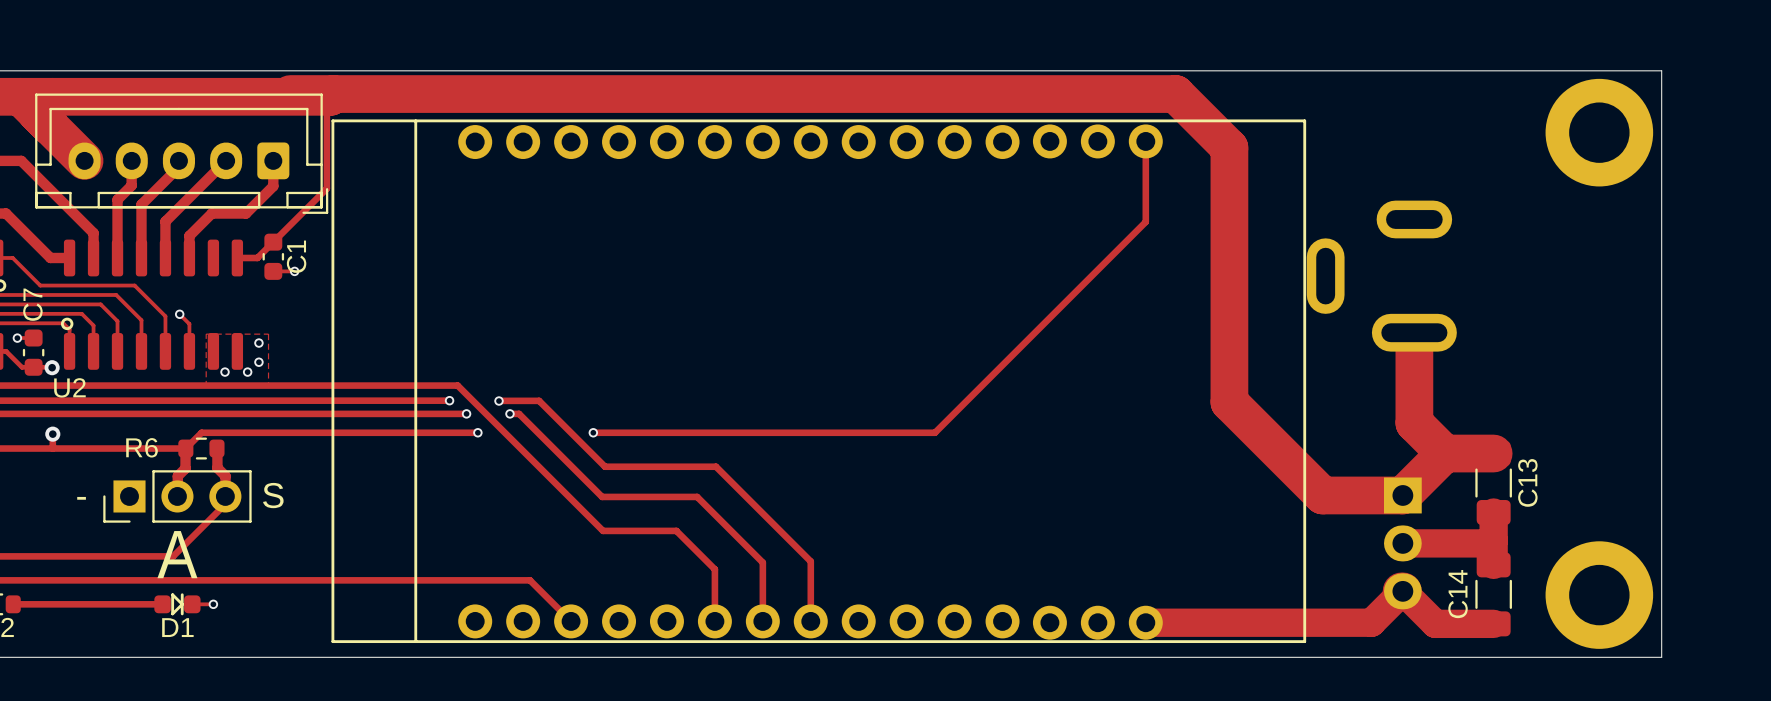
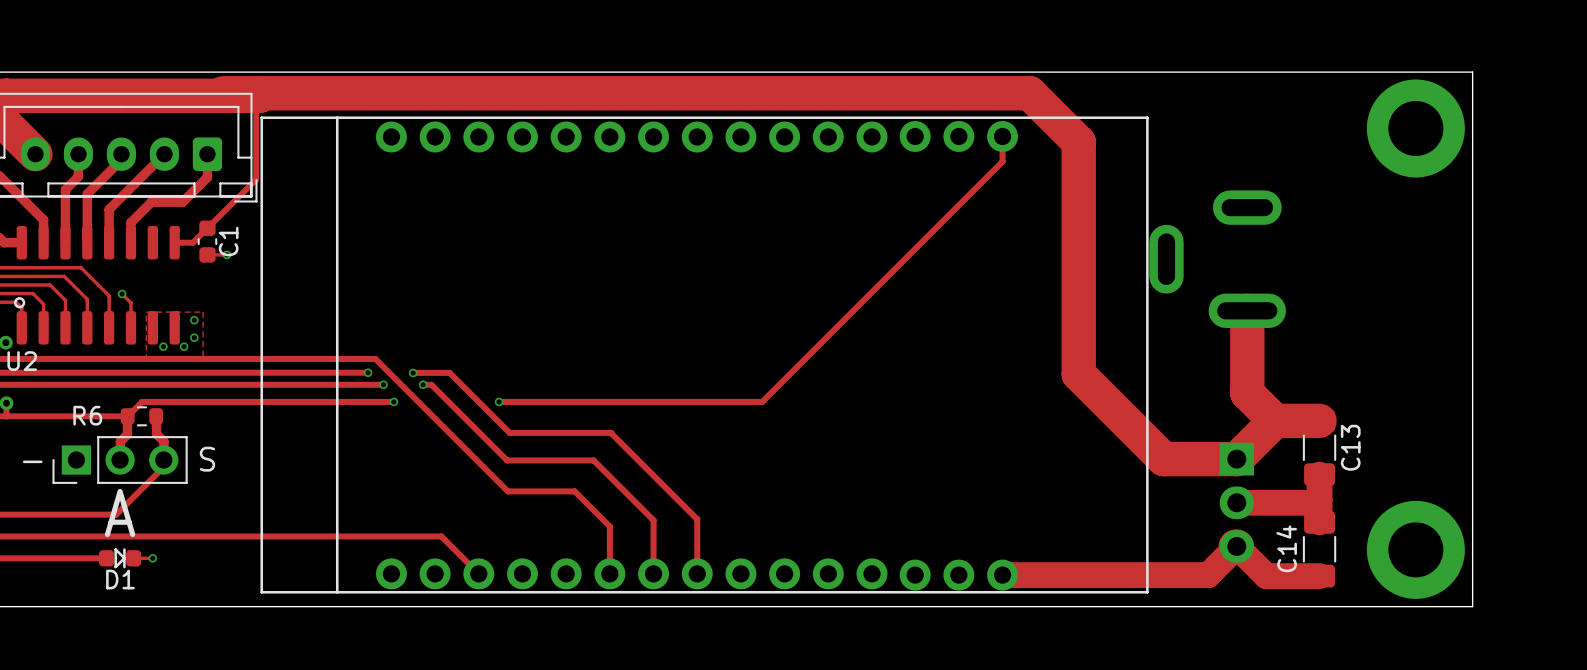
track: (1145, 169) (1145, 221) (934, 432) (882, 432) -> (1002, 161) (762, 401)

